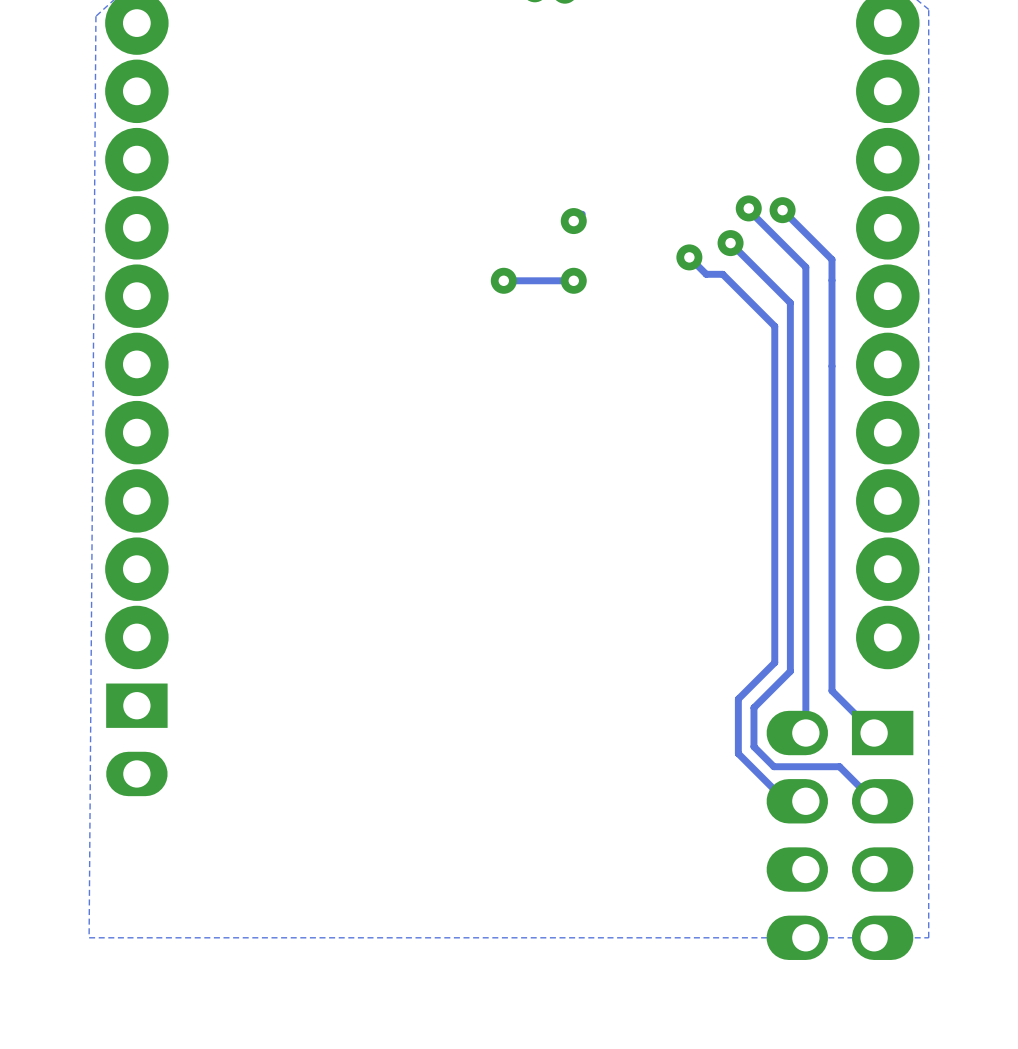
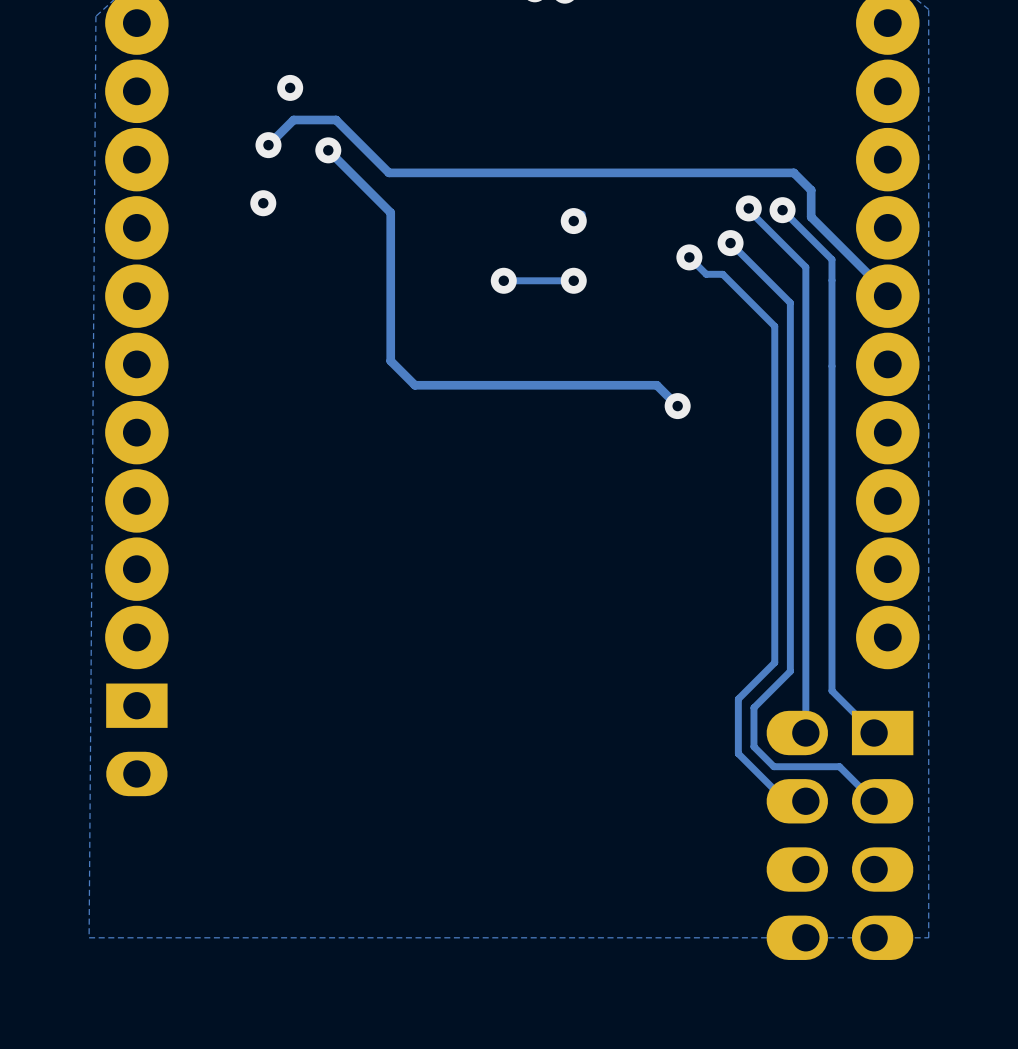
via: none -> (290, 87)
track: none -> (268, 145) (293, 119) (336, 119) (388, 172) (793, 172) (811, 190) (811, 217) (887, 293) (887, 296)
via: none -> (268, 145)
track: none -> (328, 150) (390, 212) (390, 360) (414, 385) (656, 385) (677, 406)
via: none -> (328, 150)
via: none -> (263, 203)
via: none -> (677, 406)

